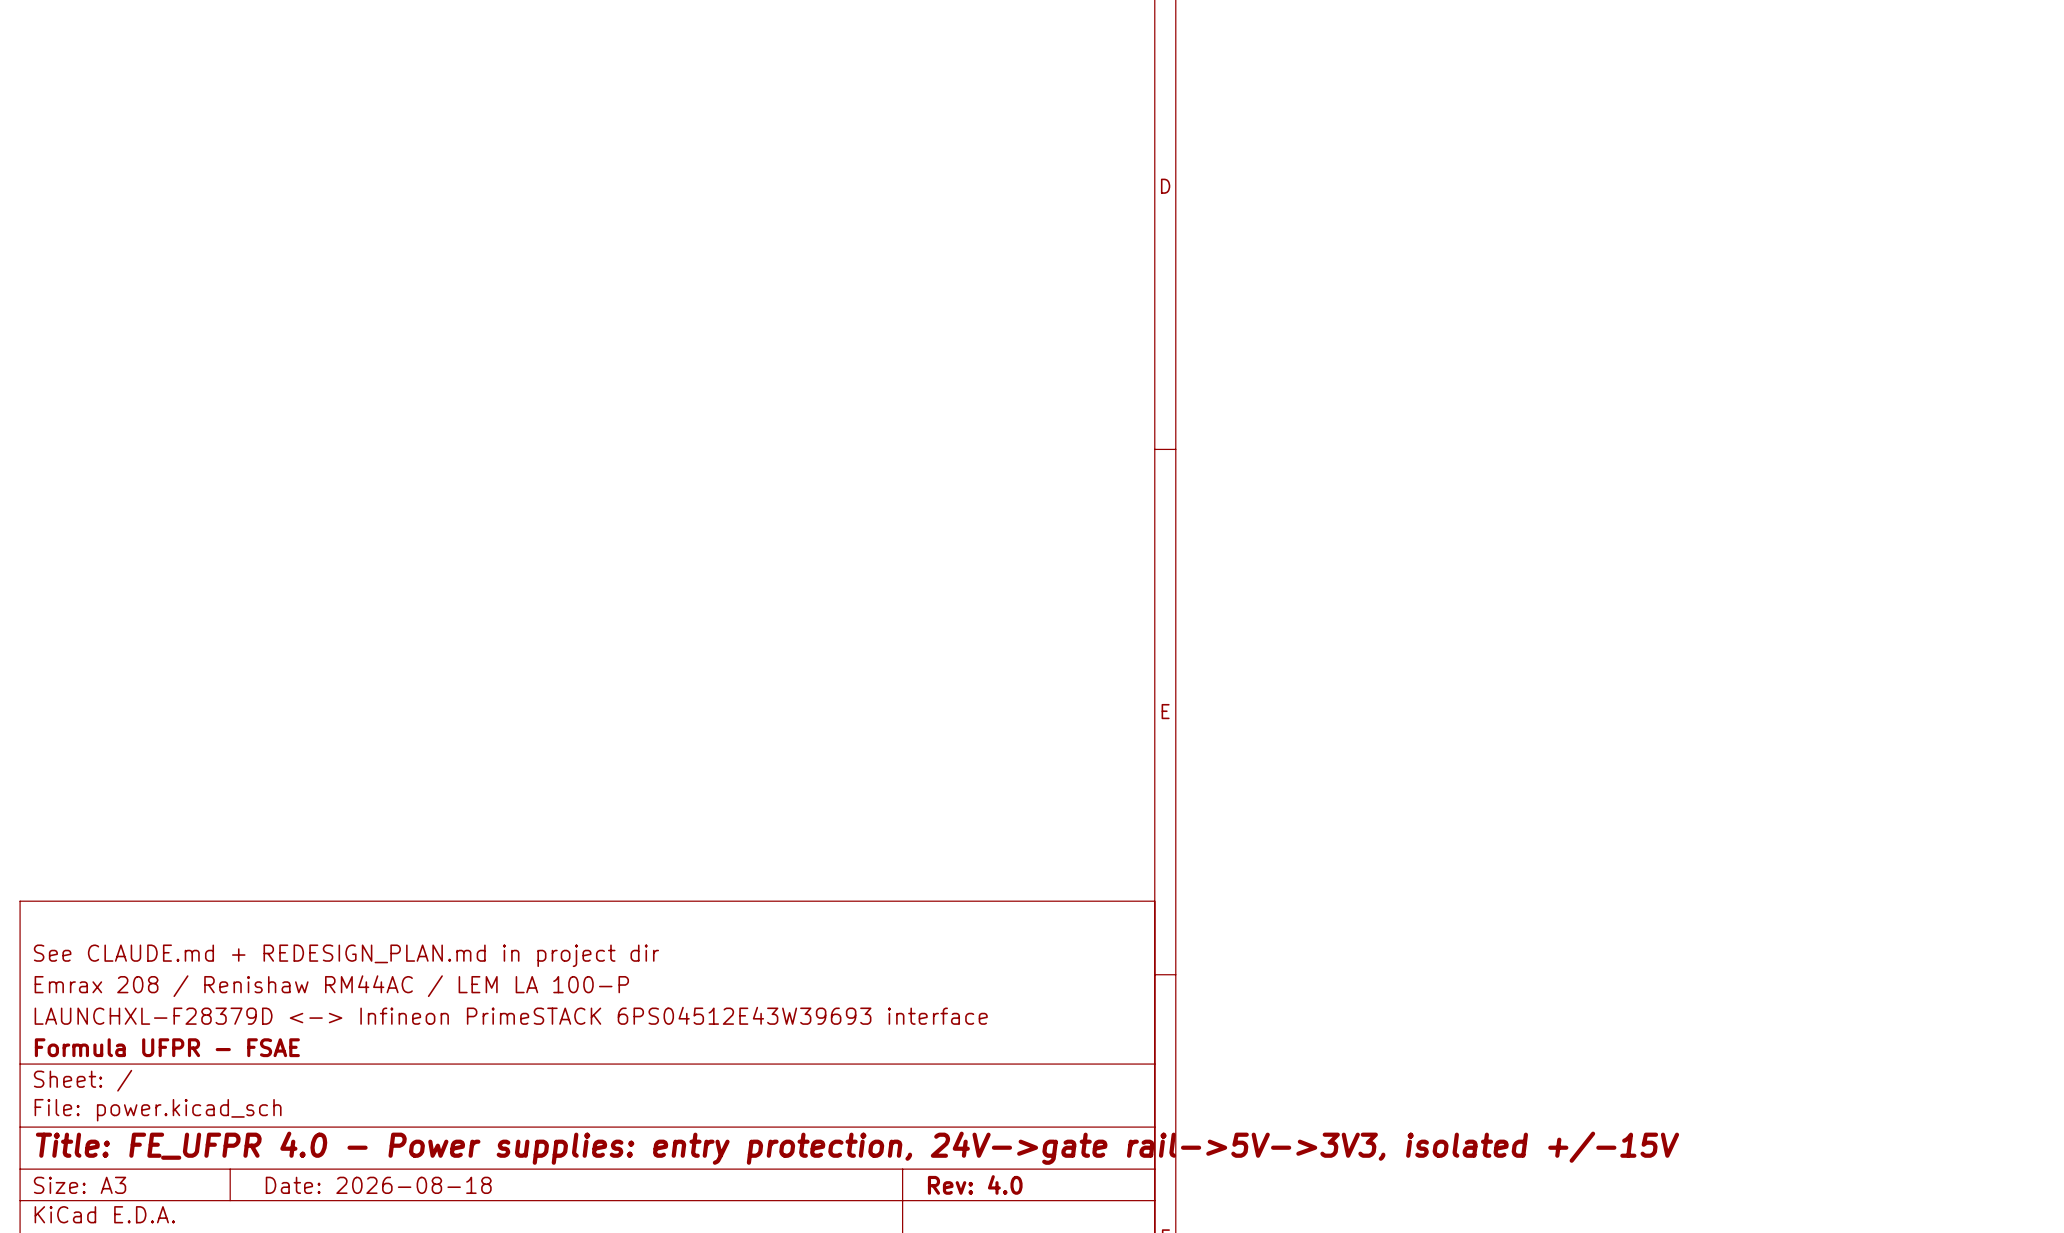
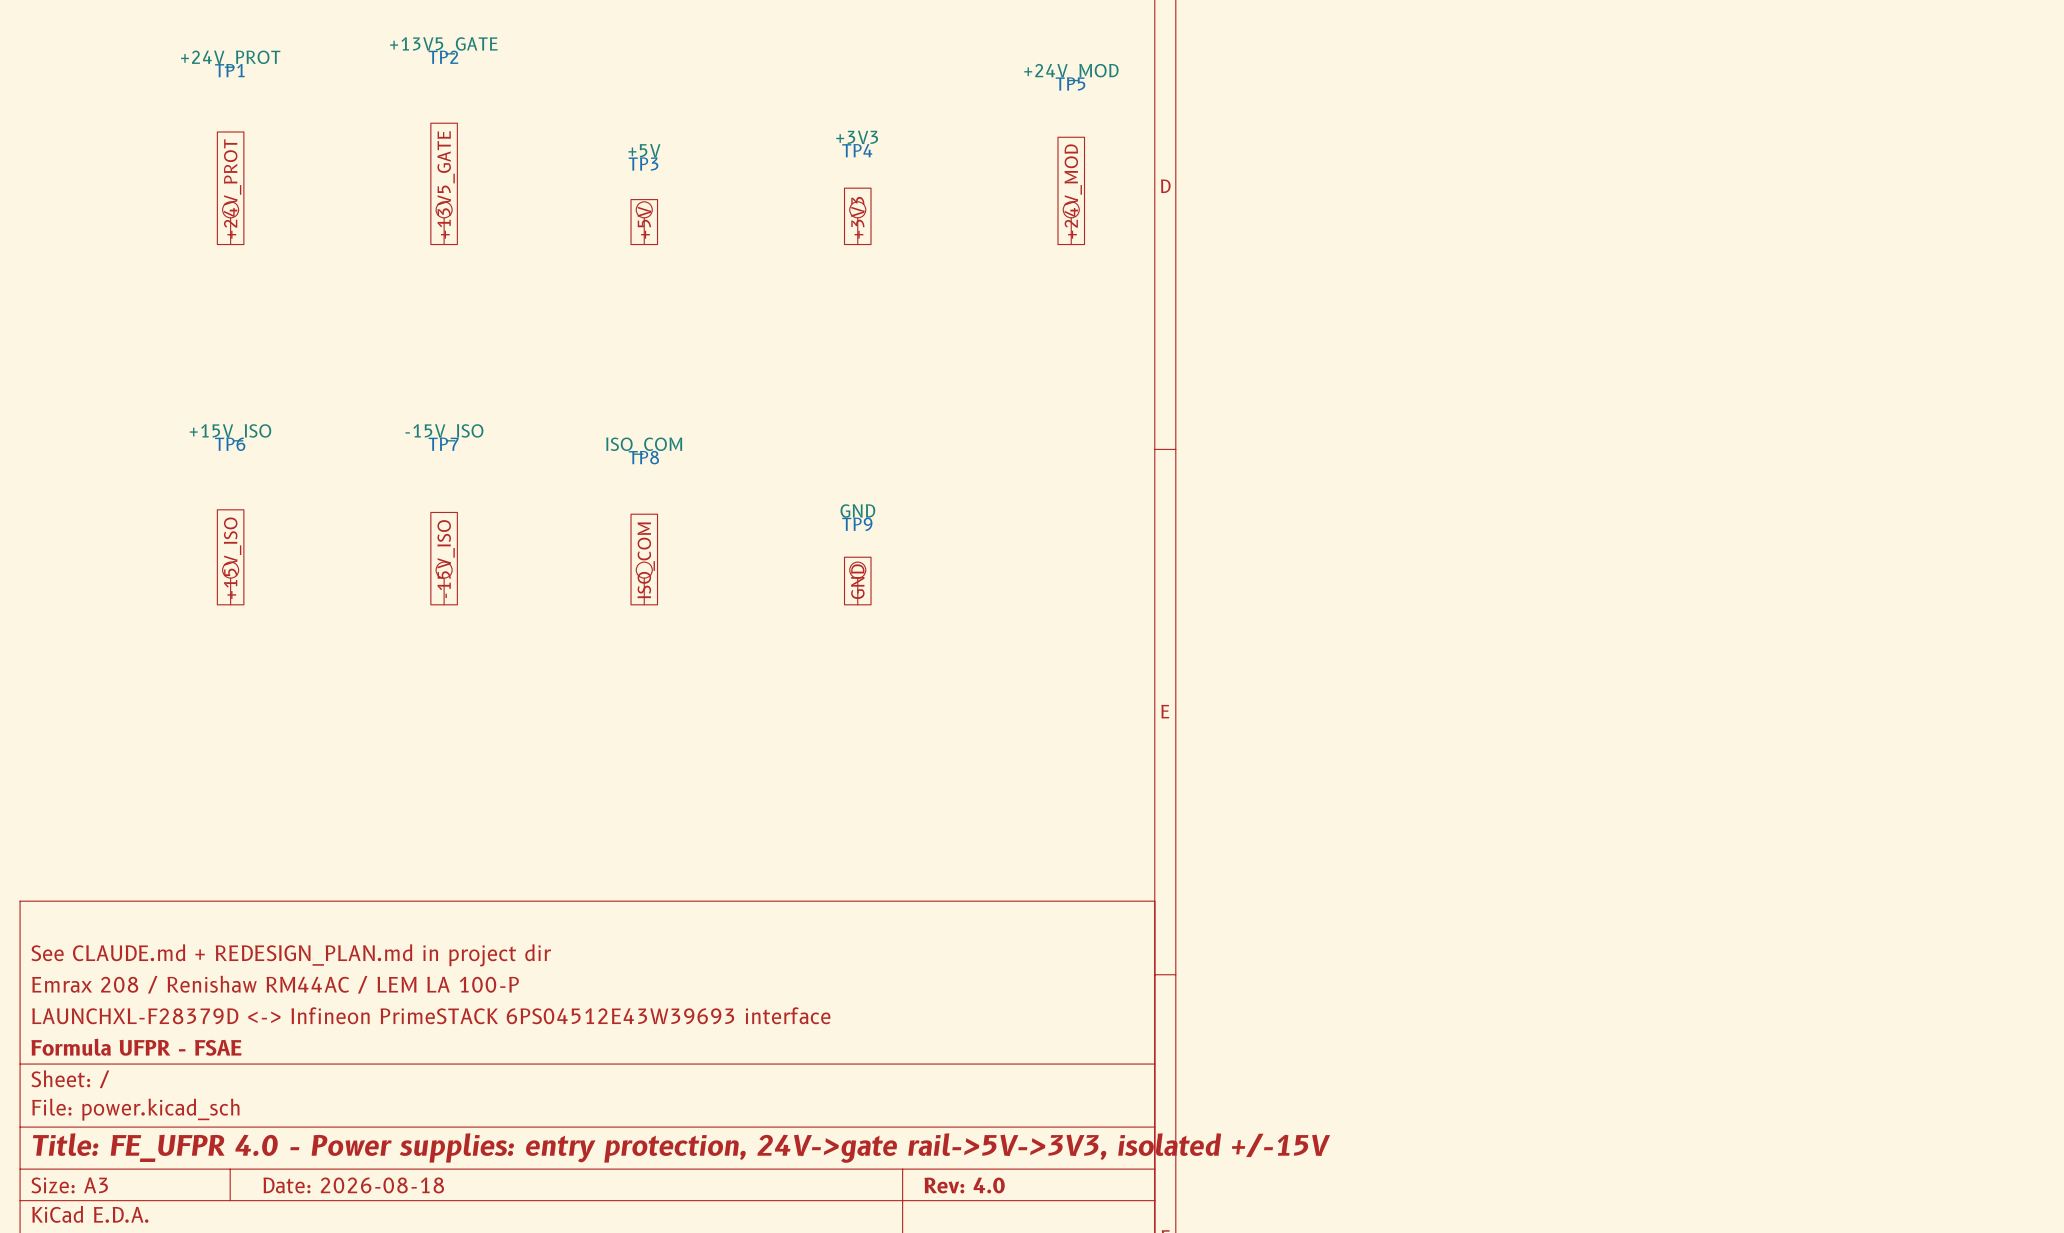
global label: none -> +13V5_GATE (446, 184)
global label: none -> +24V_PROT (232, 188)
global label: none -> +24V_MOD (1073, 191)
global label: none -> +3V3 (857, 217)
global label: none -> +5V (644, 222)
TP1: none -> +24V_PROT (230, 223)
TP2: none -> +13V5_GATE (444, 223)
TP3: none -> +5V (644, 223)
TP4: none -> +3V3 (857, 223)
TP5: none -> +24V_MOD (1071, 223)
global label: none -> +15V_ISO (232, 558)
global label: none -> -15V_ISO (446, 559)
global label: none -> ISO_COM (646, 560)
global label: none -> GND (857, 581)
TP6: none -> +15V_ISO (230, 583)
TP7: none -> -15V_ISO (444, 583)
TP8: none -> ISO_COM (644, 583)
TP9: none -> GND (857, 583)

